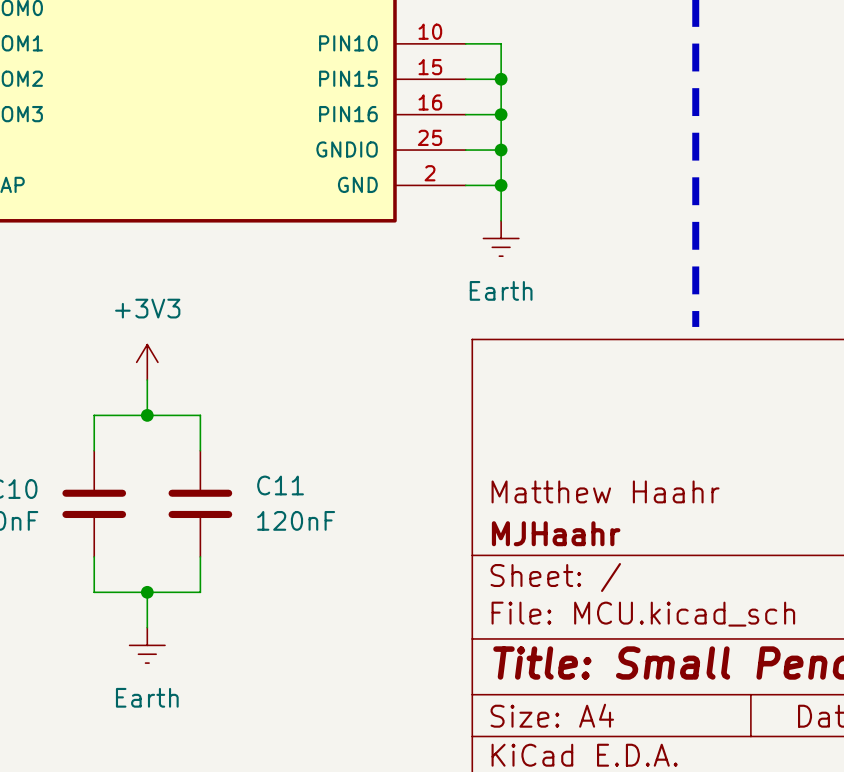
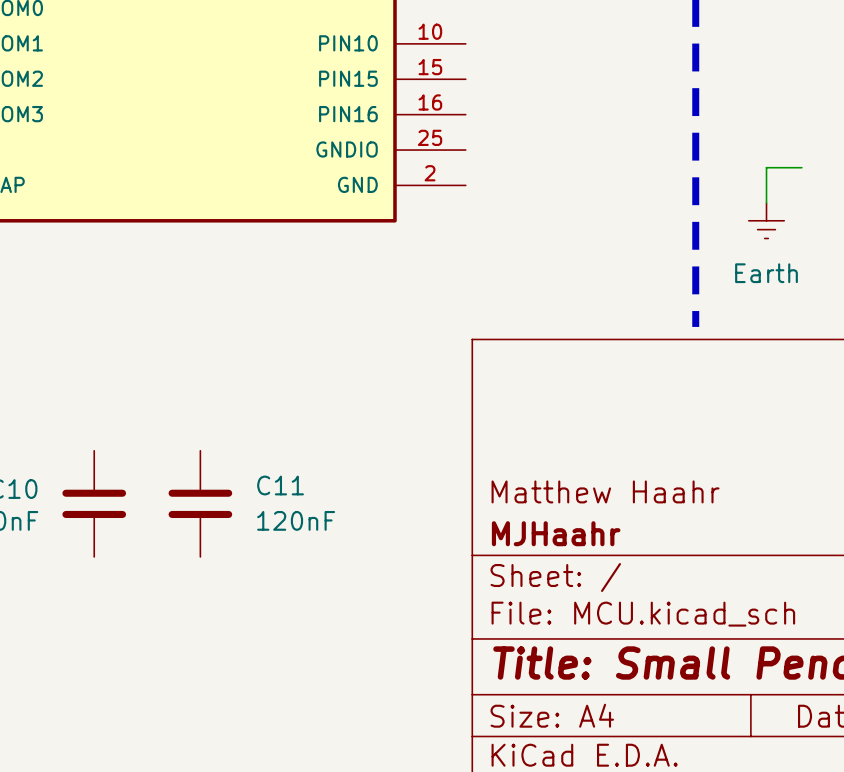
wire: (465, 43) (501, 43) (501, 220) -> none
wire: (465, 79) (501, 79) -> none
junction: (501, 79) -> none
wire: (465, 114) (501, 114) -> none
junction: (501, 114) -> none
wire: (465, 150) (501, 150) -> none
junction: (501, 150) -> none
wire: none -> (801, 167) (766, 167) (766, 203)
wire: (465, 185) (501, 185) -> none
junction: (501, 185) -> none
power symbol: none -> Earth (766, 220)
power symbol: Earth (501, 238) -> none
power symbol: +3V3 (147, 362) -> none
wire: (147, 380) (147, 415) -> none
junction: (147, 415) -> none
wire: (94, 450) (94, 415) (200, 415) (200, 450) -> none
wire: (94, 556) (94, 592) (200, 592) (200, 556) -> none
wire: (147, 592) (147, 627) -> none
junction: (147, 592) -> none
power symbol: Earth (147, 645) -> none

